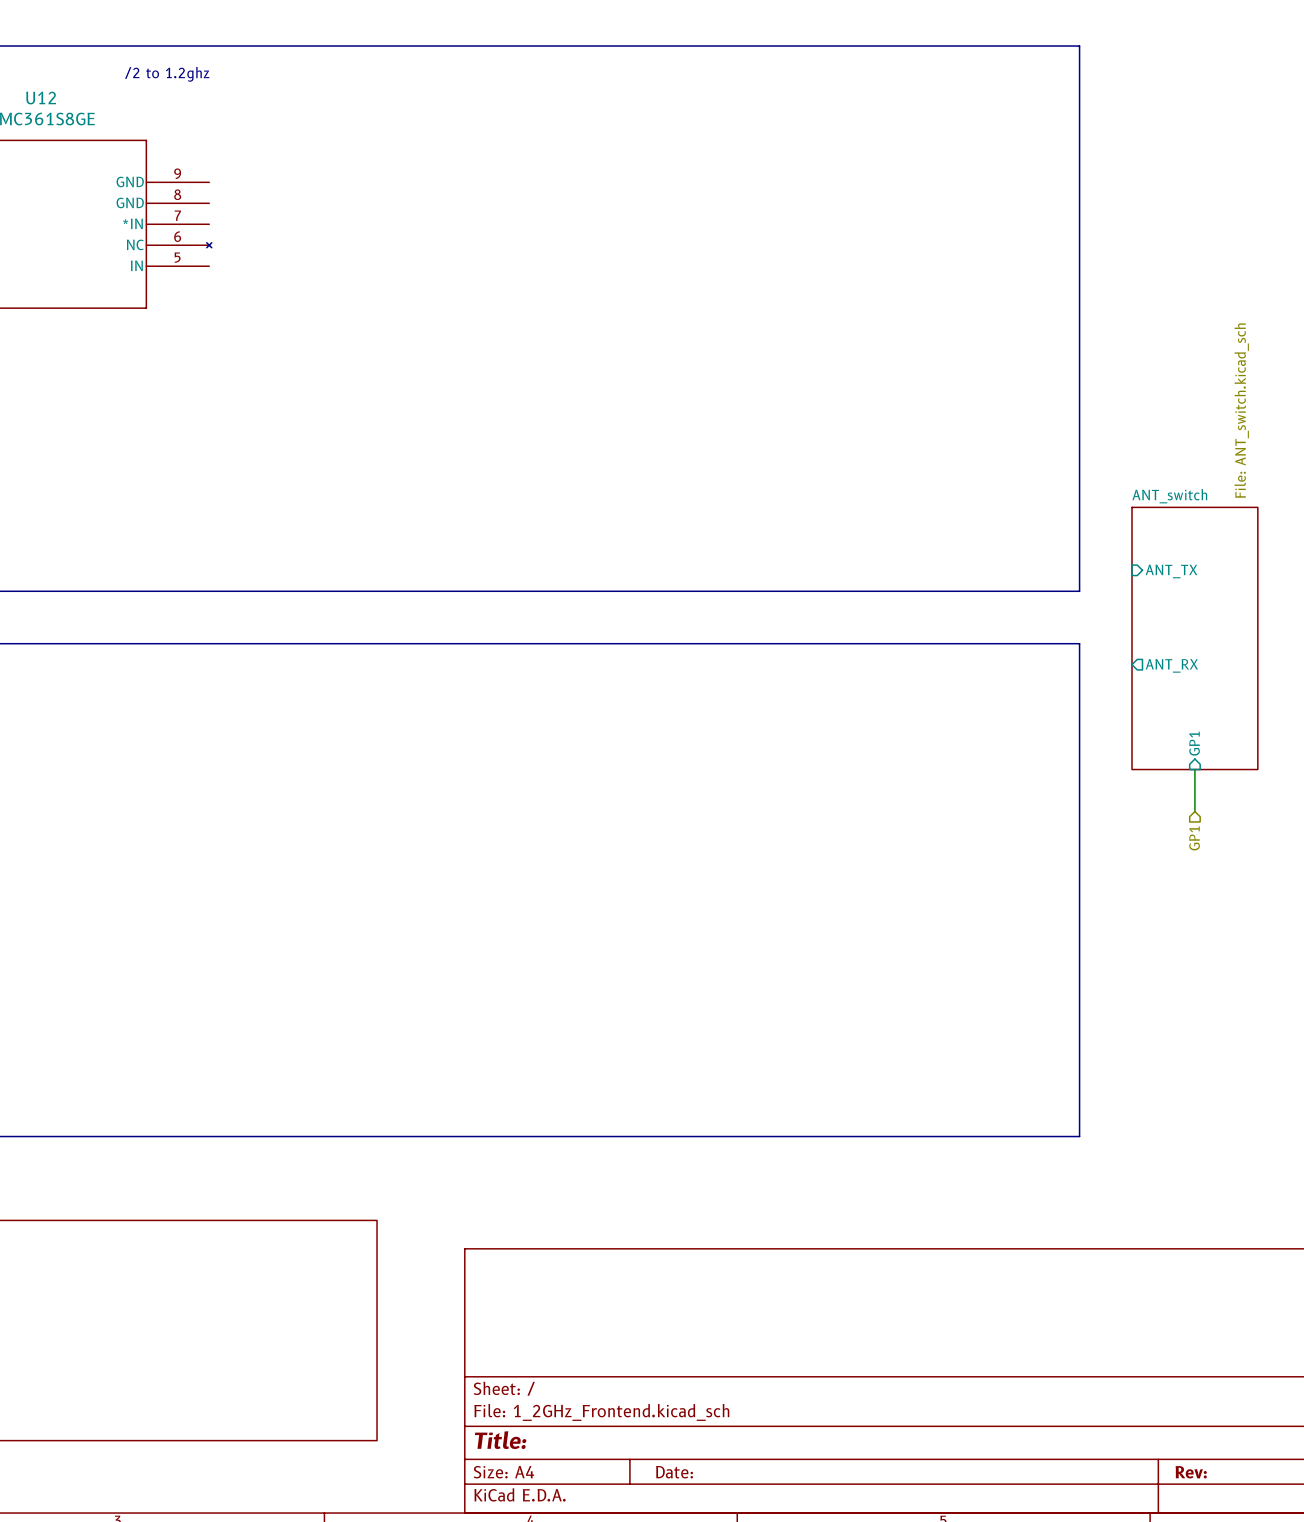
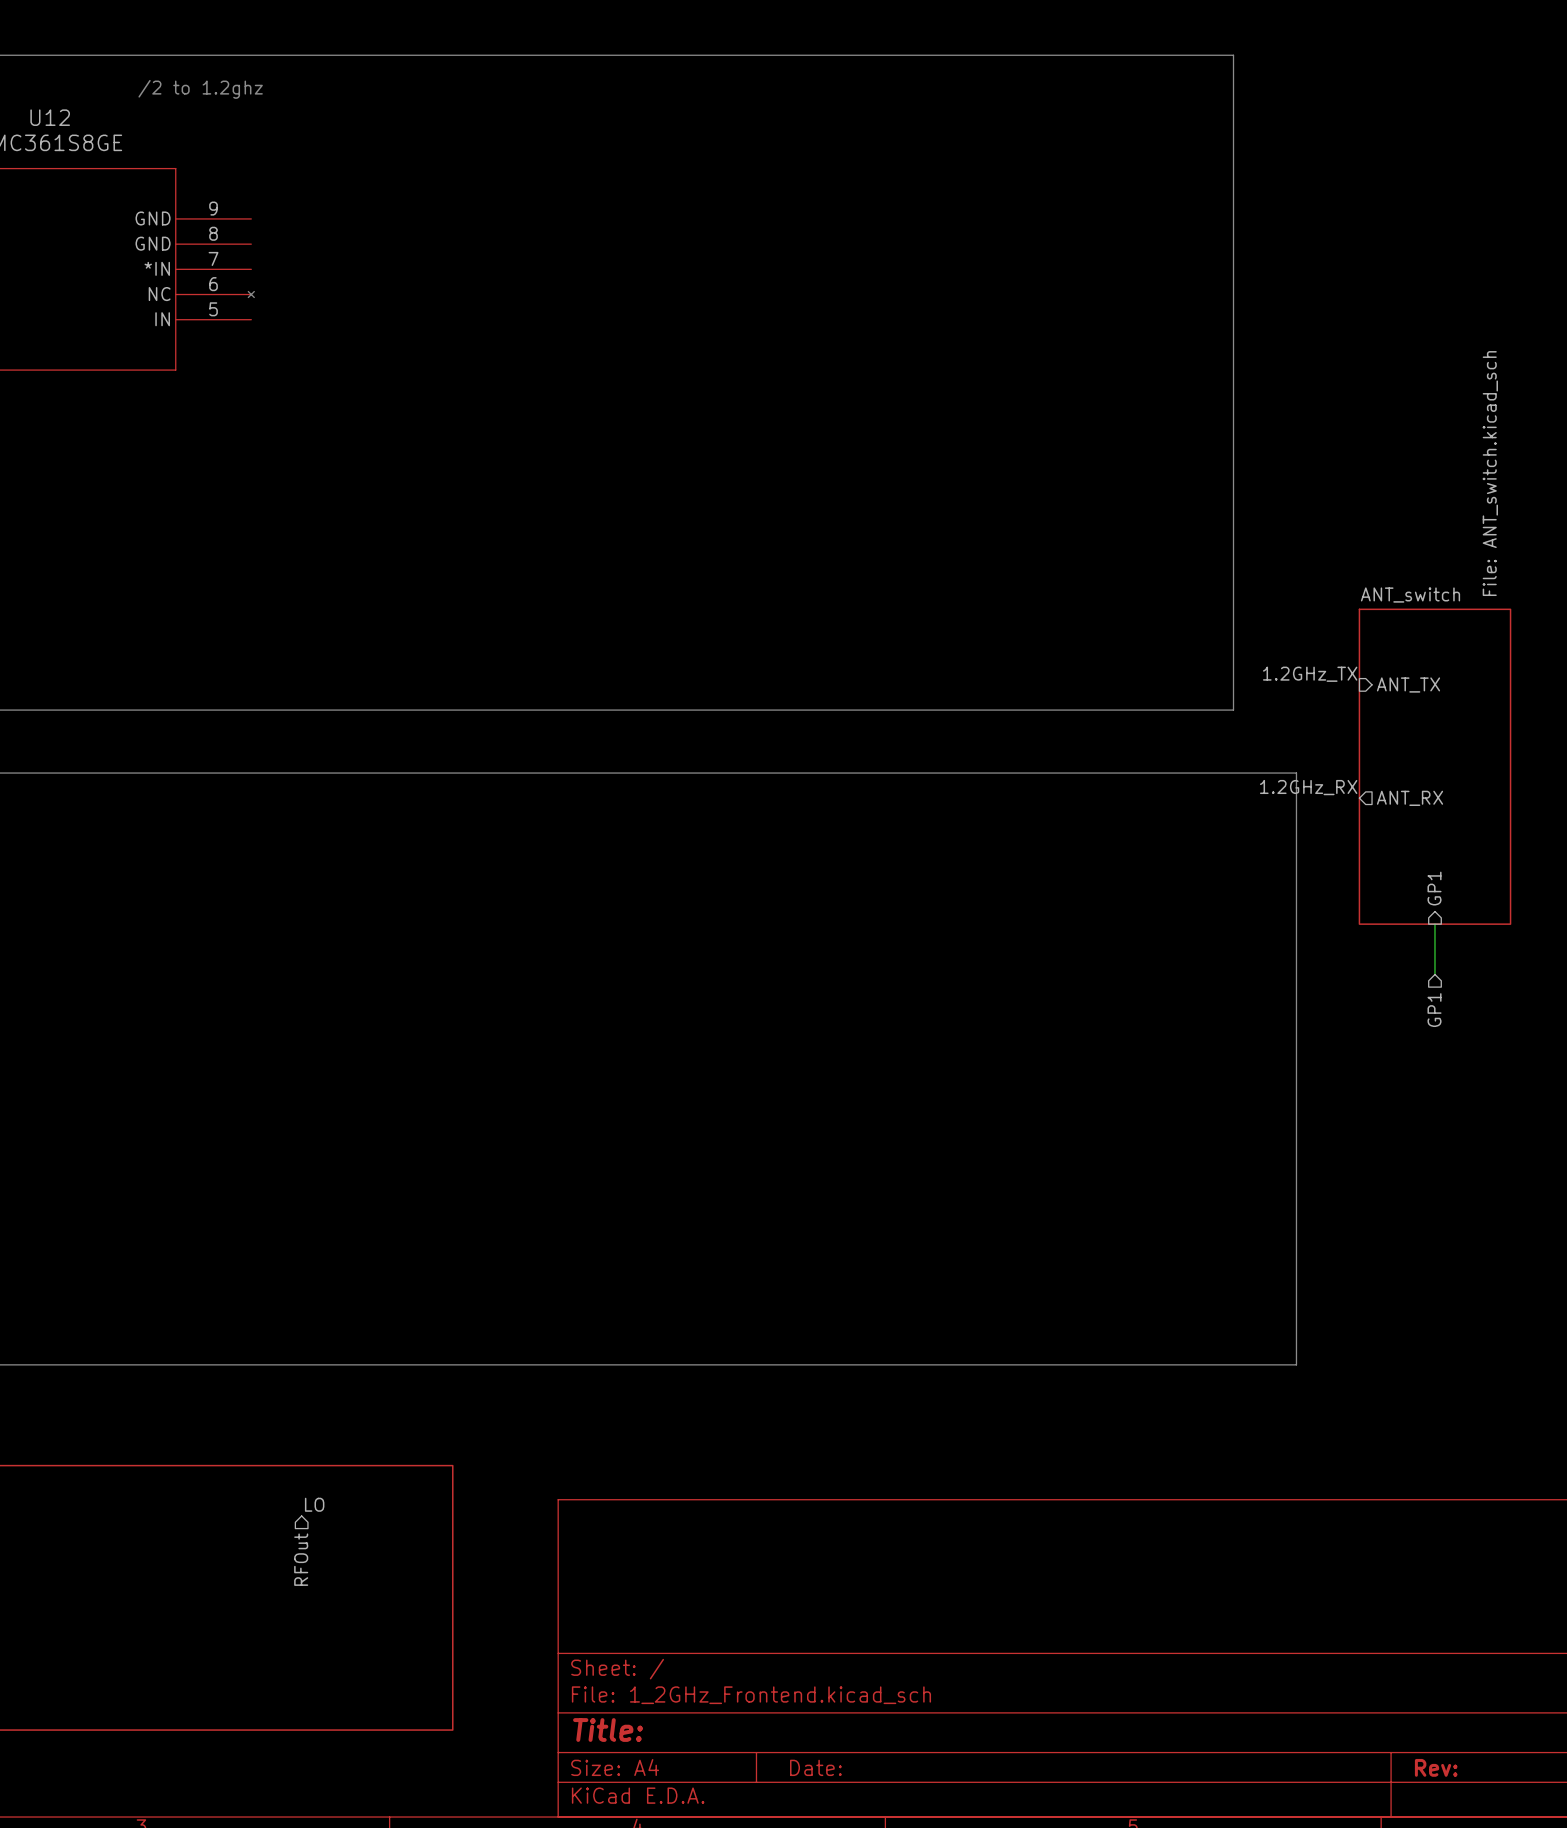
line: (1027, 46) (1079, 46) (1079, 591) (1027, 591) -> (1233, 55) (1233, 710)
label: none -> 1.2GHz_TX (1310, 674)
label: none -> 1.2GHz_RX (1308, 787)
label: none -> LO (314, 1504)
sheet pin: none -> RFOut (301, 1559)

